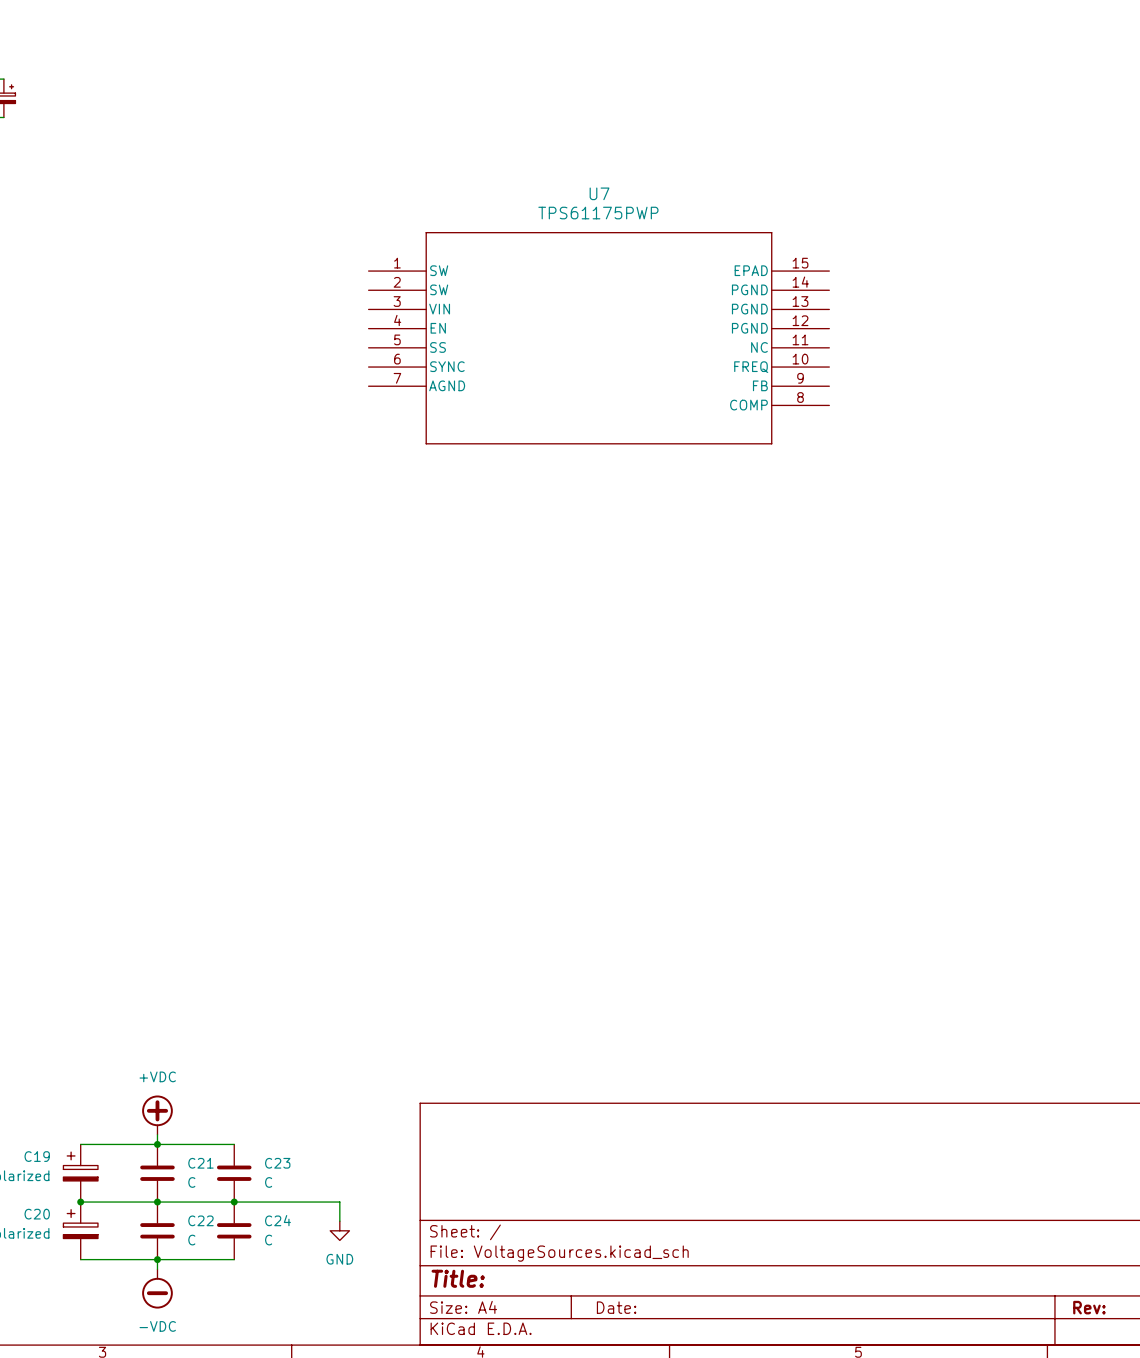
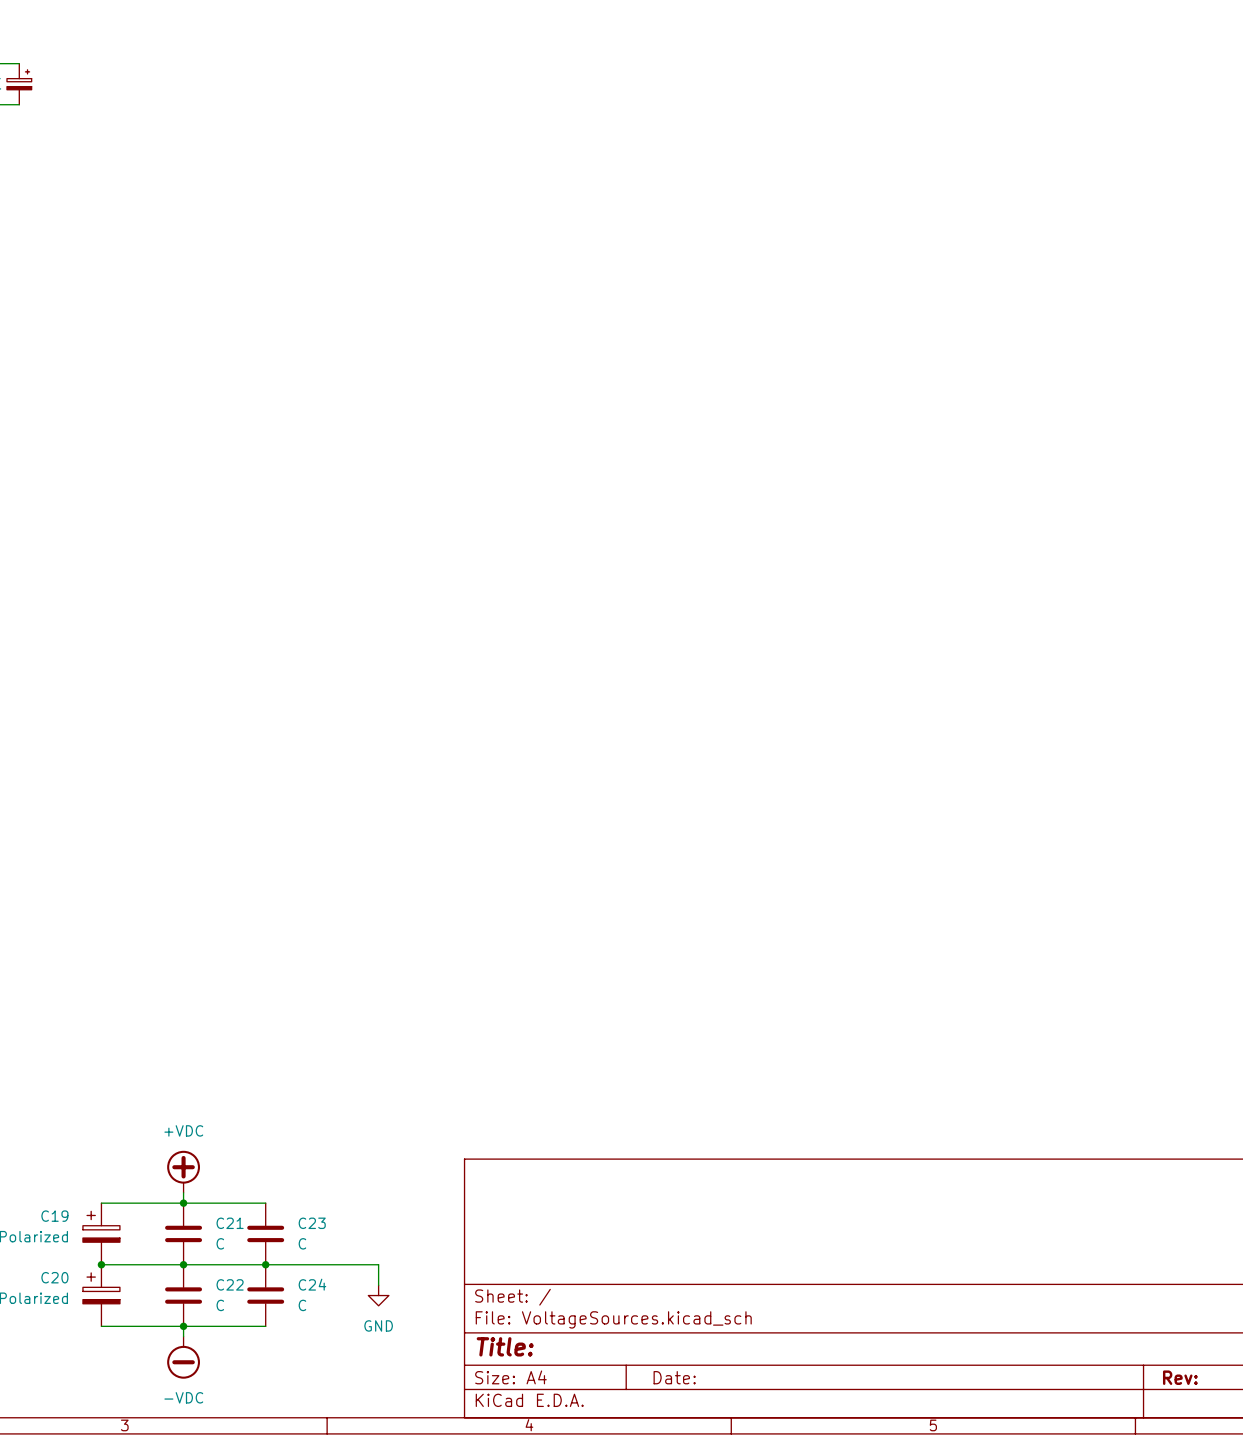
U7: TPS61175PWP (598, 338) -> none

